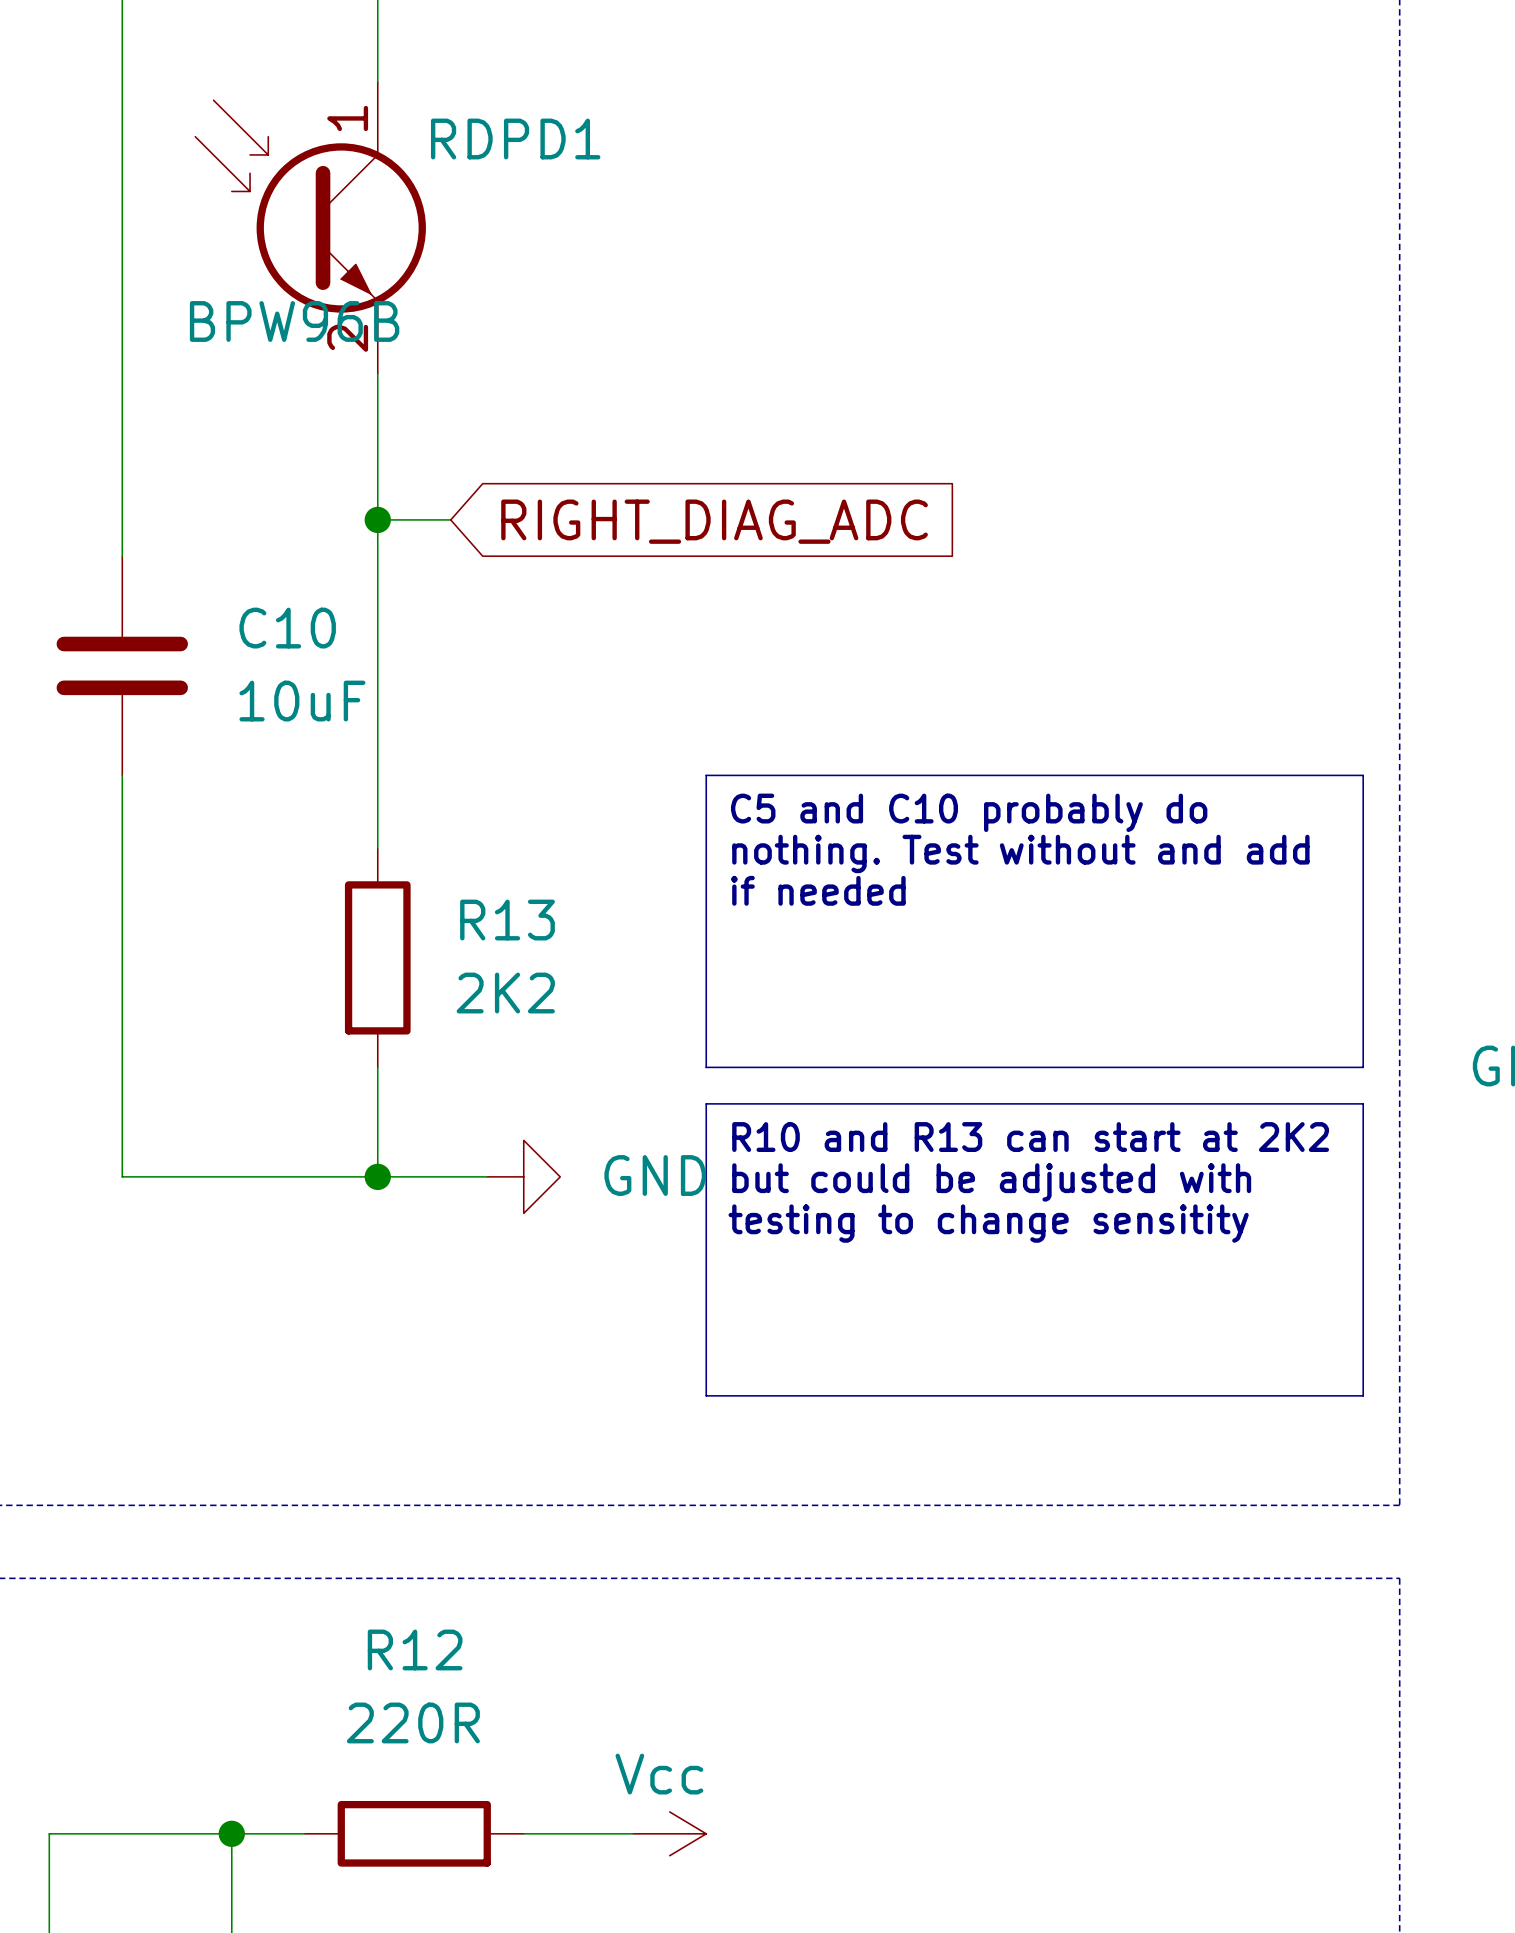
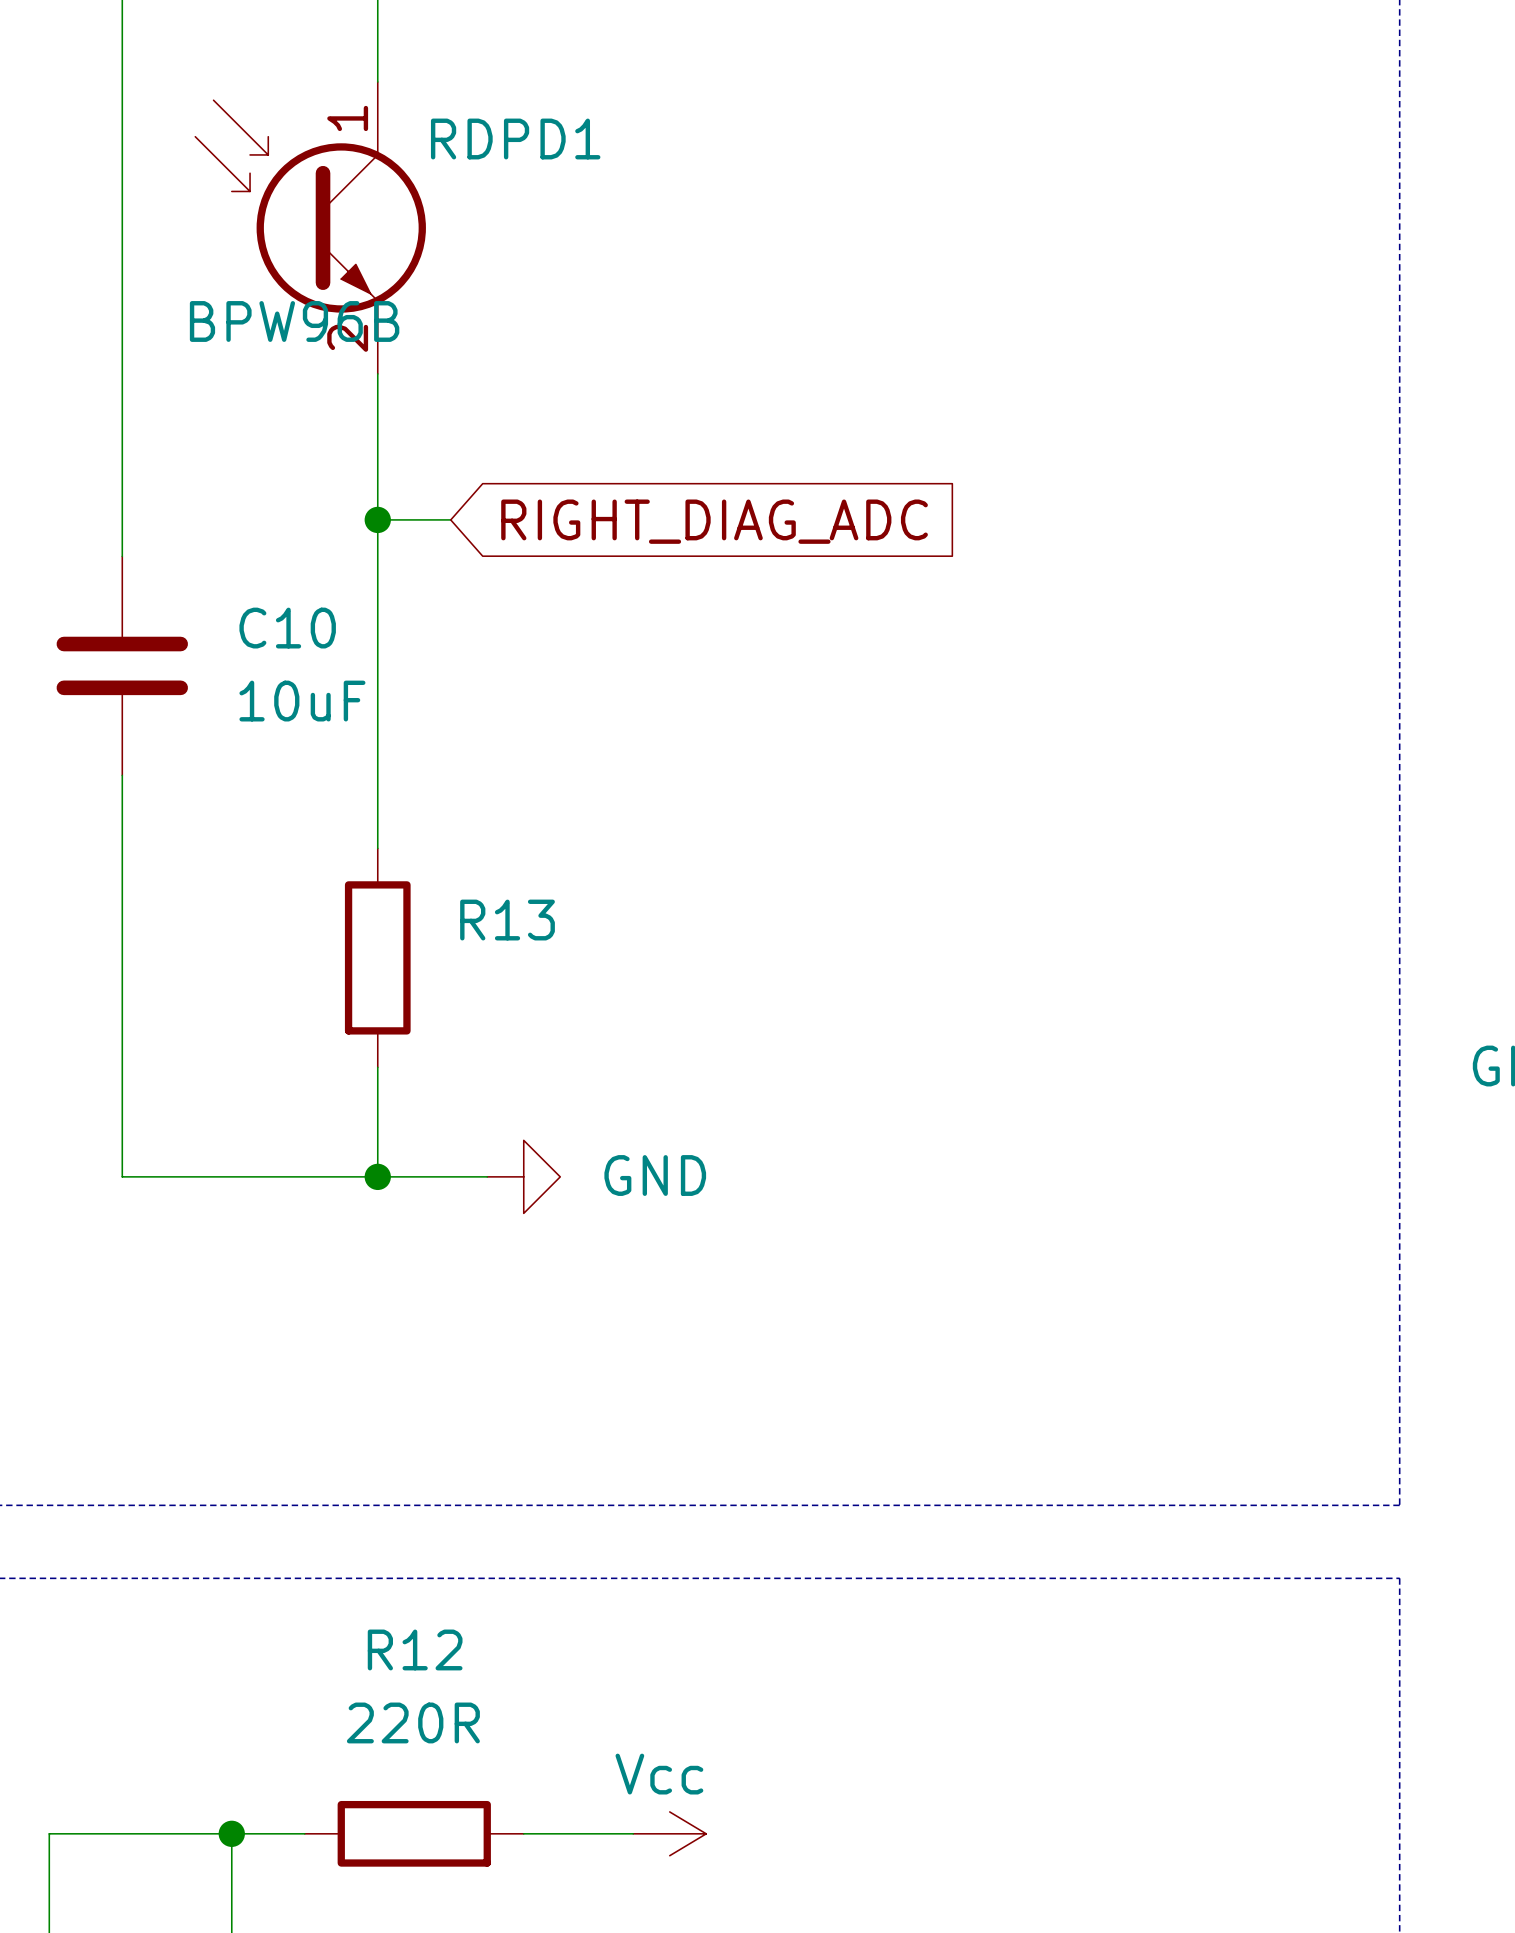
line: (706, 775) (706, 1067) (1363, 1067) (1363, 775) (706, 775) -> none
text: C5 and C10 probably do (969, 812) -> none
text: nothing. Test without and add (1020, 853) -> none
text: if needed (818, 890) -> none
R13 value: 2K2 (505, 993) -> none
line: (706, 1103) (1363, 1103) (1363, 1395) (706, 1395) (706, 1103) -> none
text: R10 and R13 can start at 2K2 (1030, 1137) -> none
text: but could be adjusted with (991, 1182) -> none
text: testing to change sensitity (988, 1223) -> none

